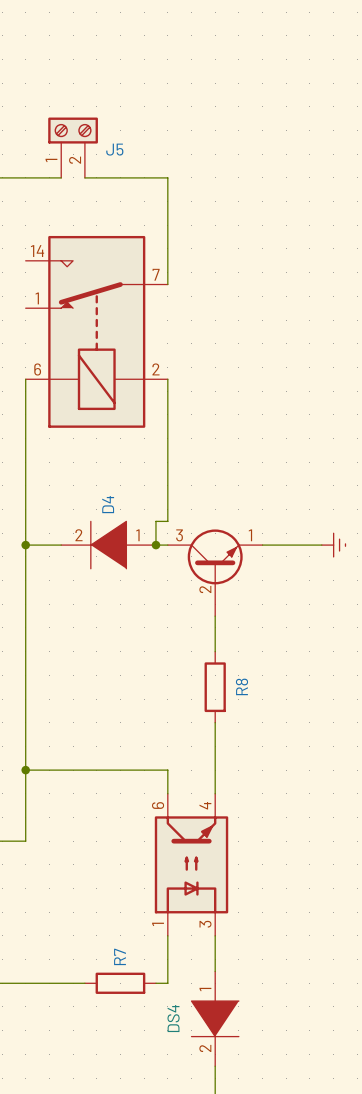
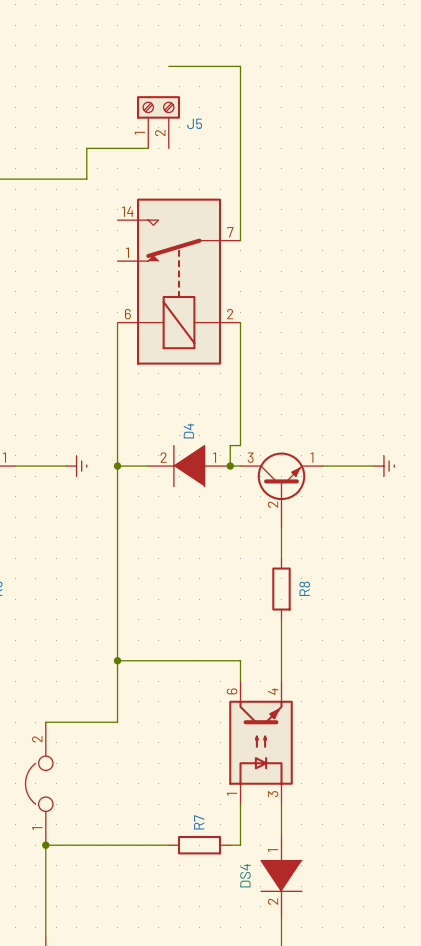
wire: (84, 177) (167, 177) -> (168, 66) (240, 66) (240, 148)

